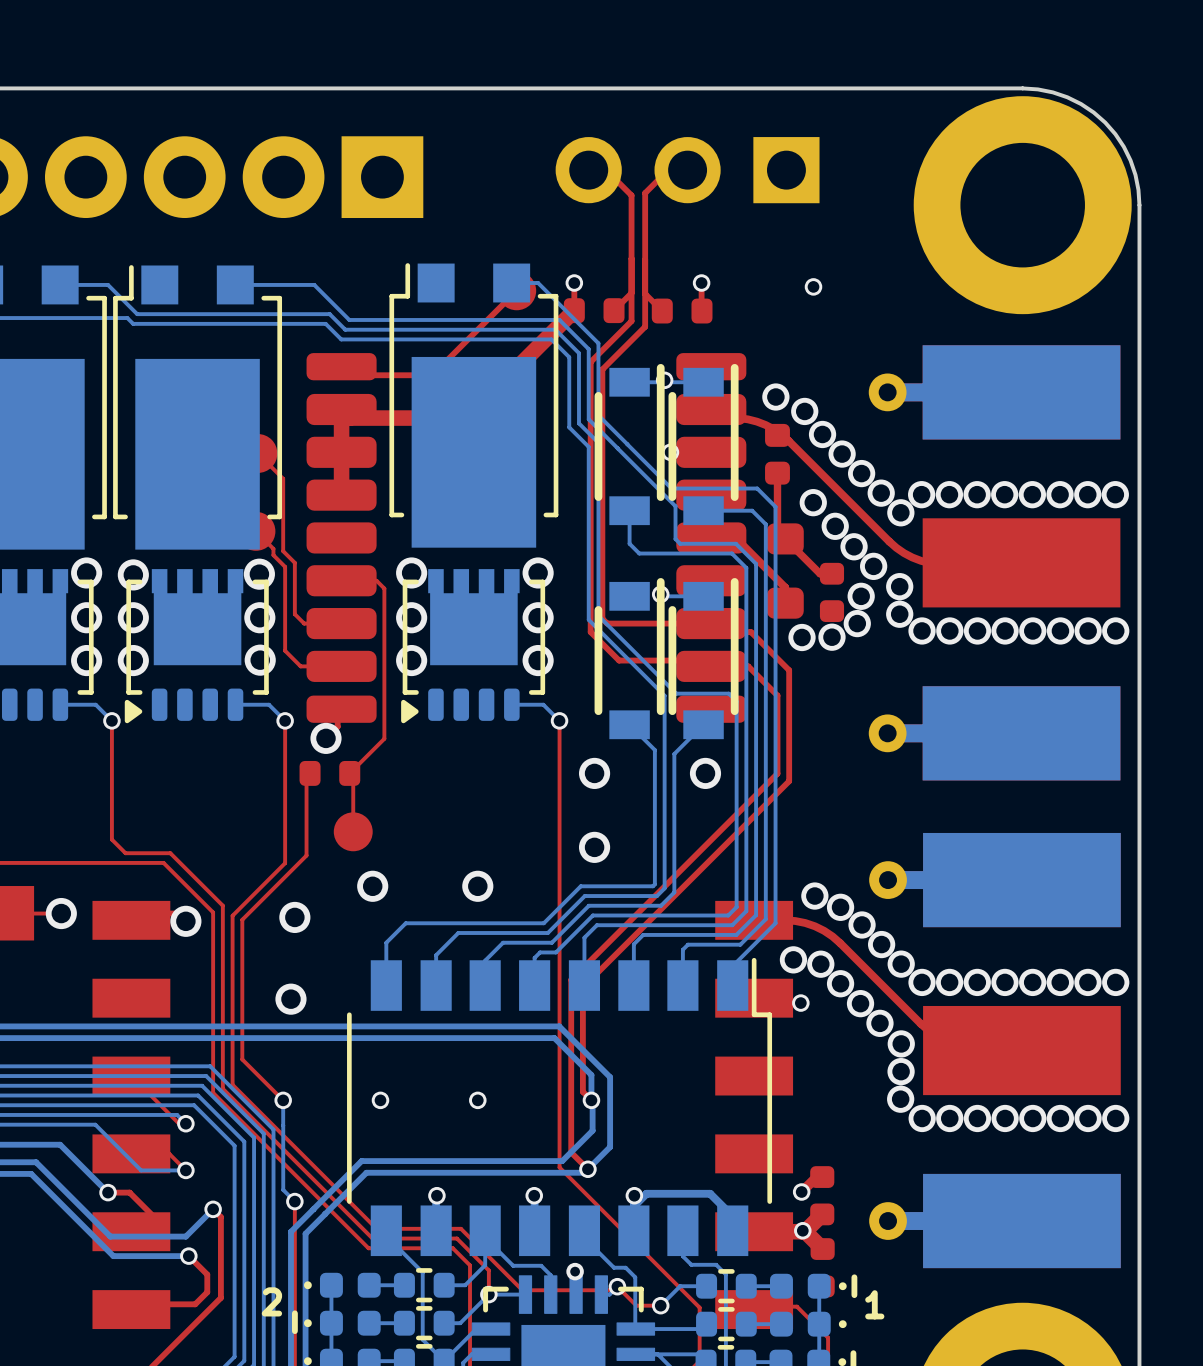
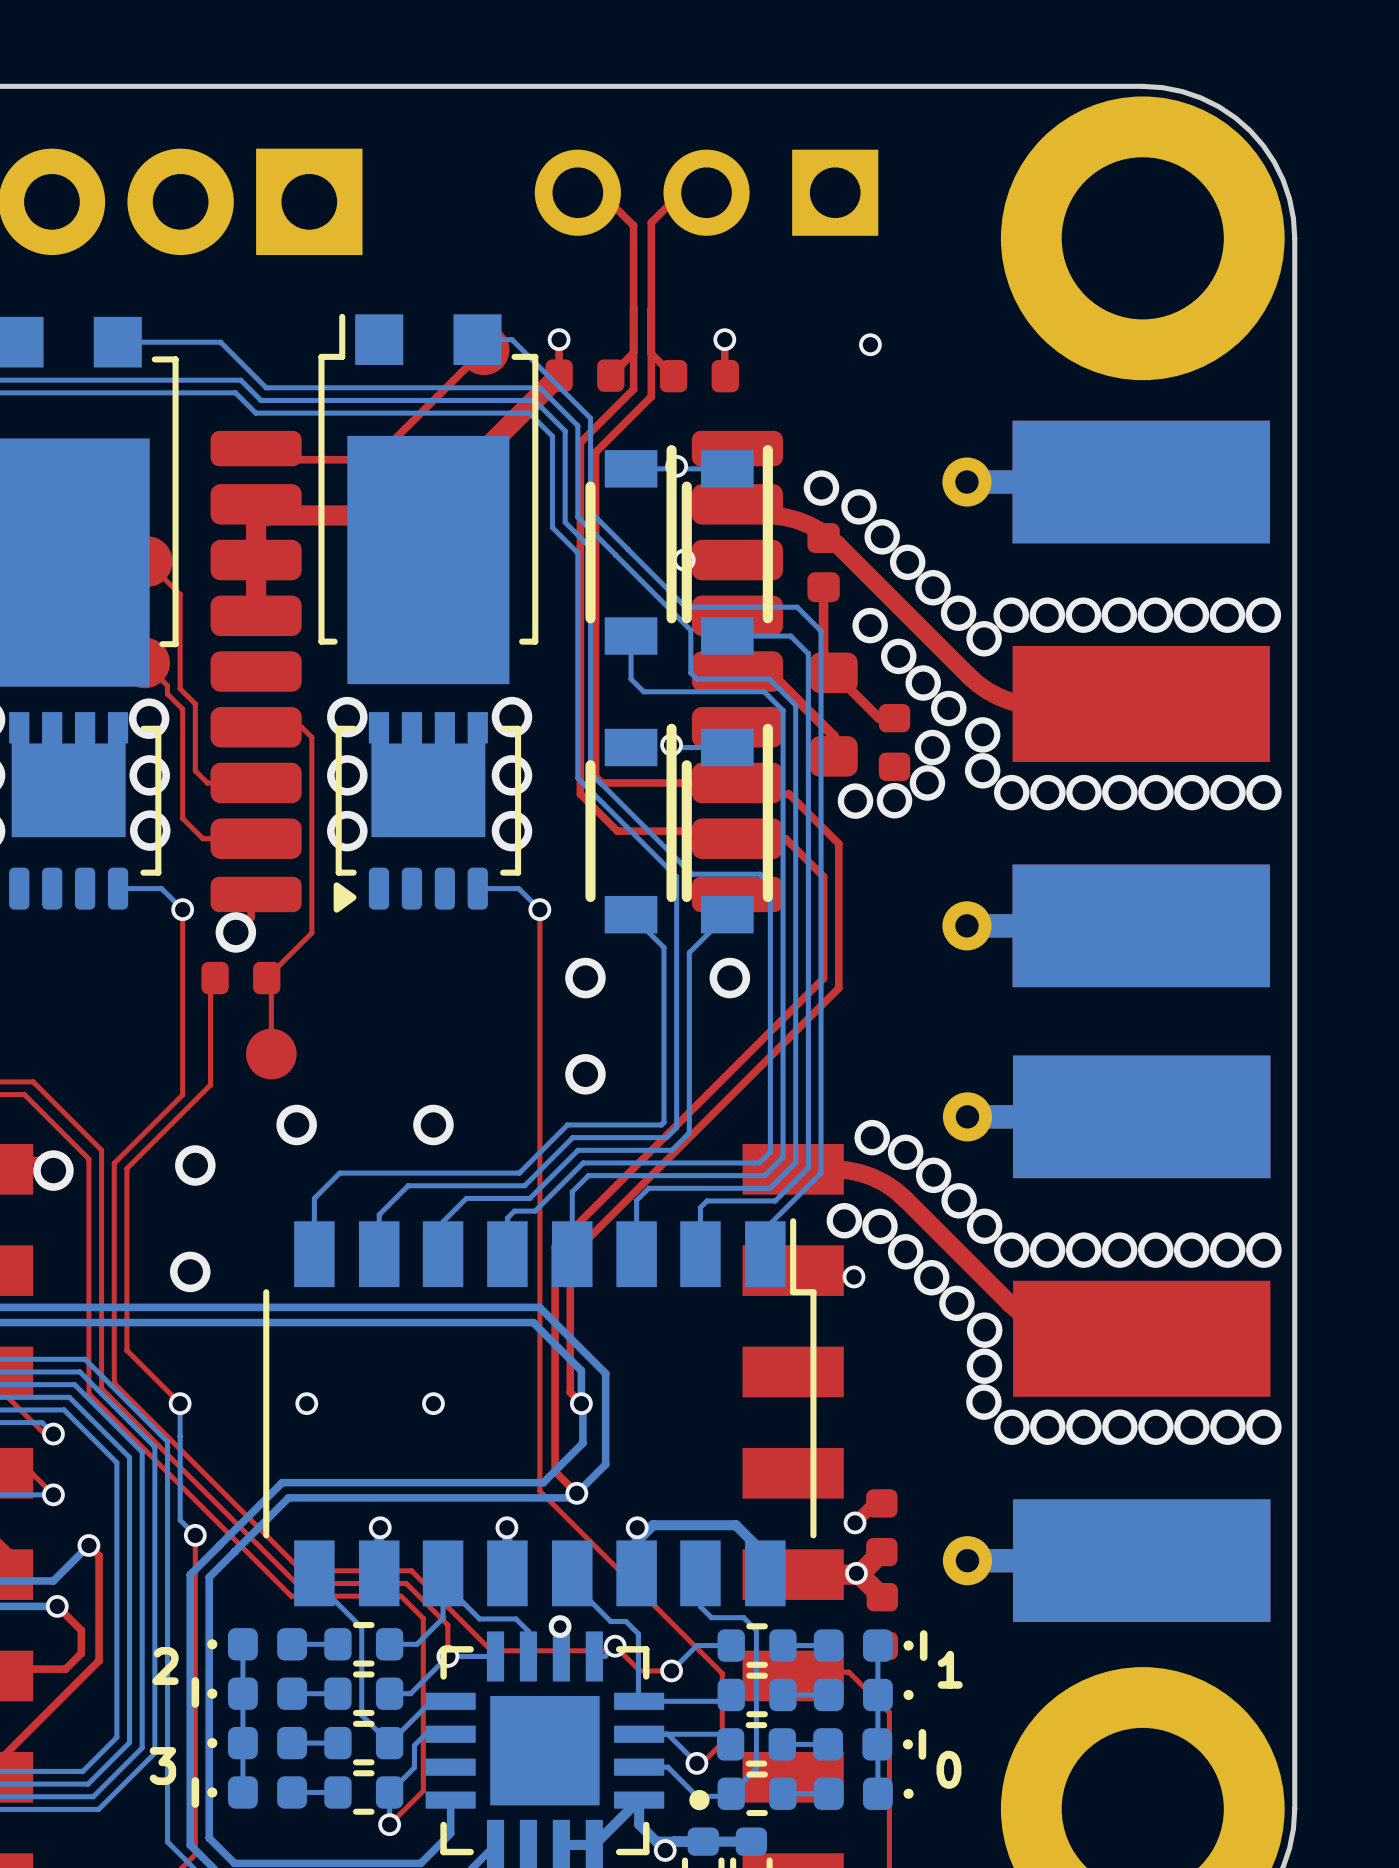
top track width: thin (738, 418) (765, 425) (781, 434) (896, 547) (921, 560) (939, 564) -> thick (773, 515) (808, 524) (828, 537) (978, 684) (1010, 701) (1034, 705)
top track width: thin (785, 920) (814, 926) (832, 936) (927, 1030) (943, 1039) (970, 1046) -> thick (833, 1169) (859, 1172) (872, 1177) (895, 1190) (1019, 1312) (1040, 1324) (1075, 1333)

